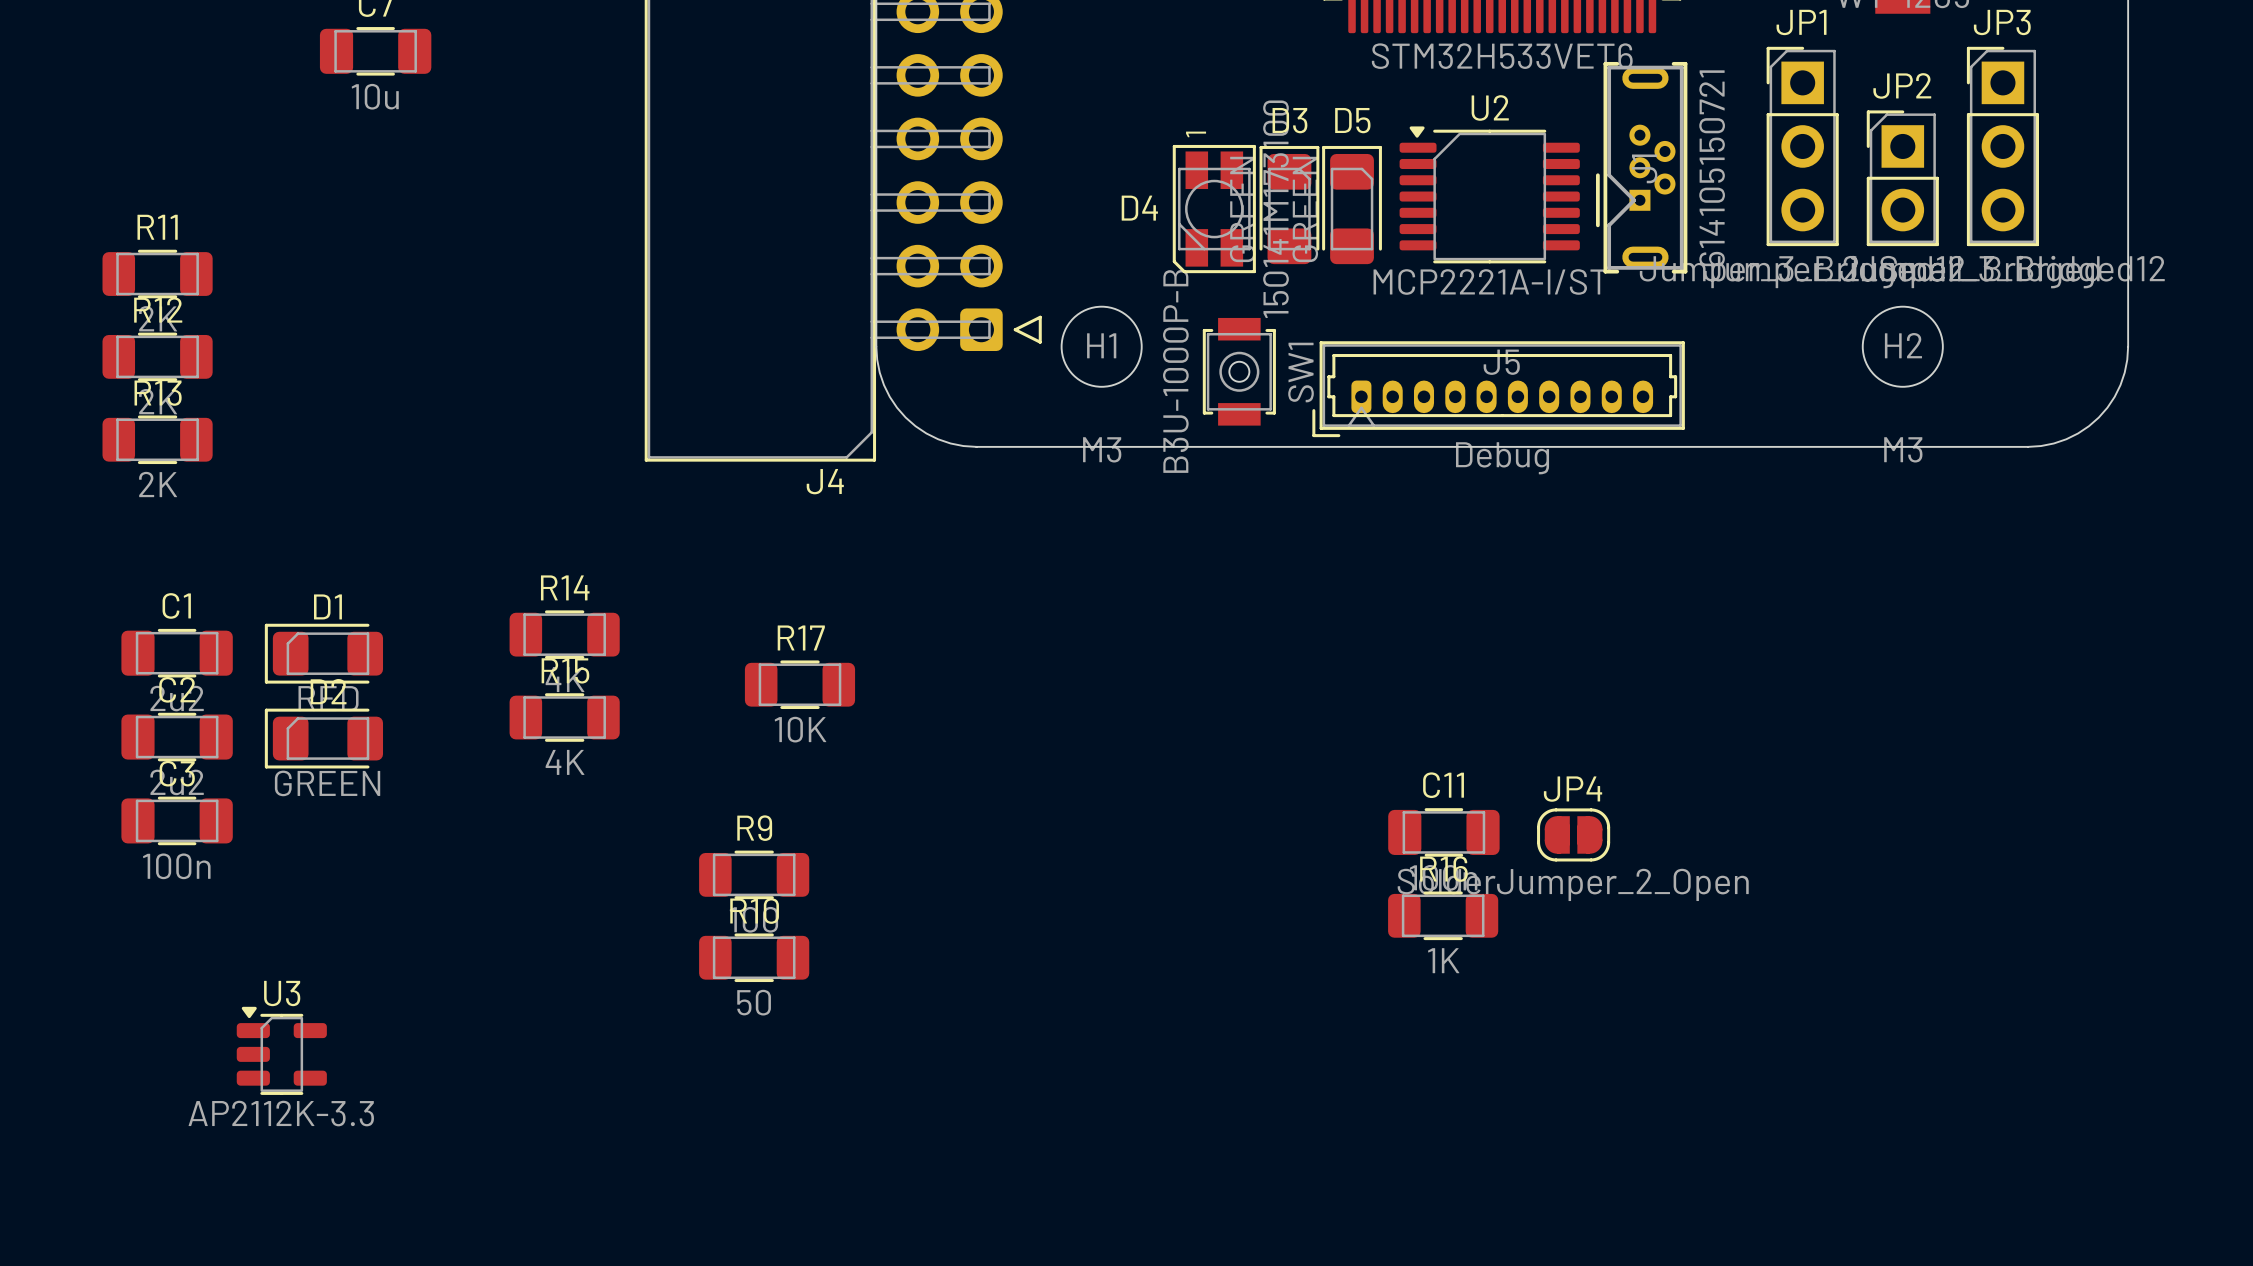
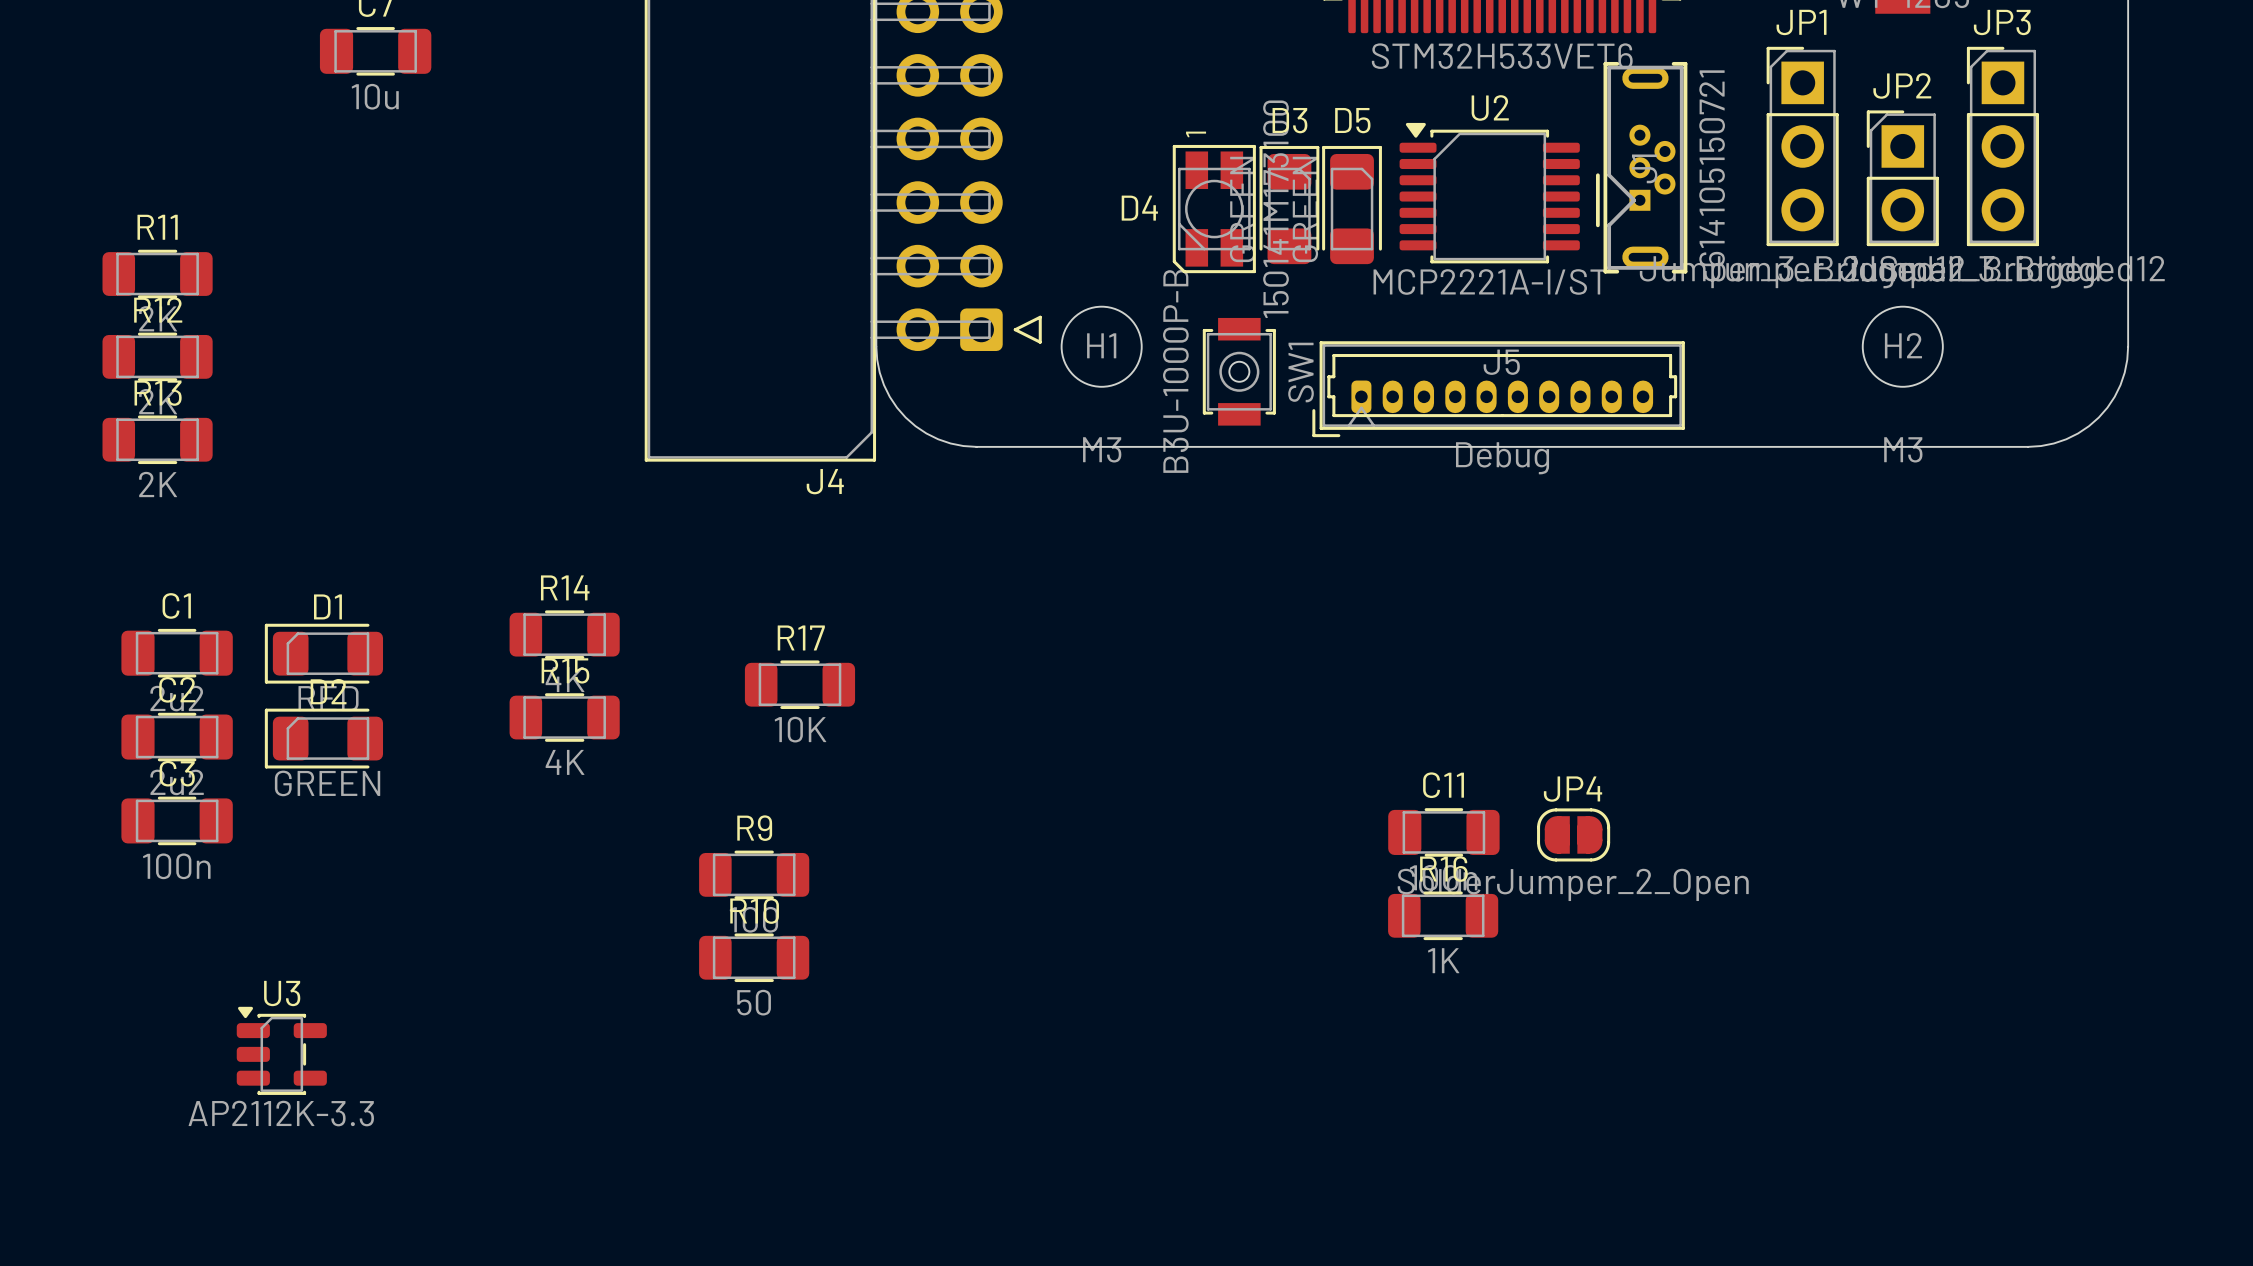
U2 footprint: [1399, 126, 1580, 264] -> [1399, 122, 1580, 264]
U3 footprint: [236, 1006, 327, 1095] -> [236, 1006, 327, 1095]

